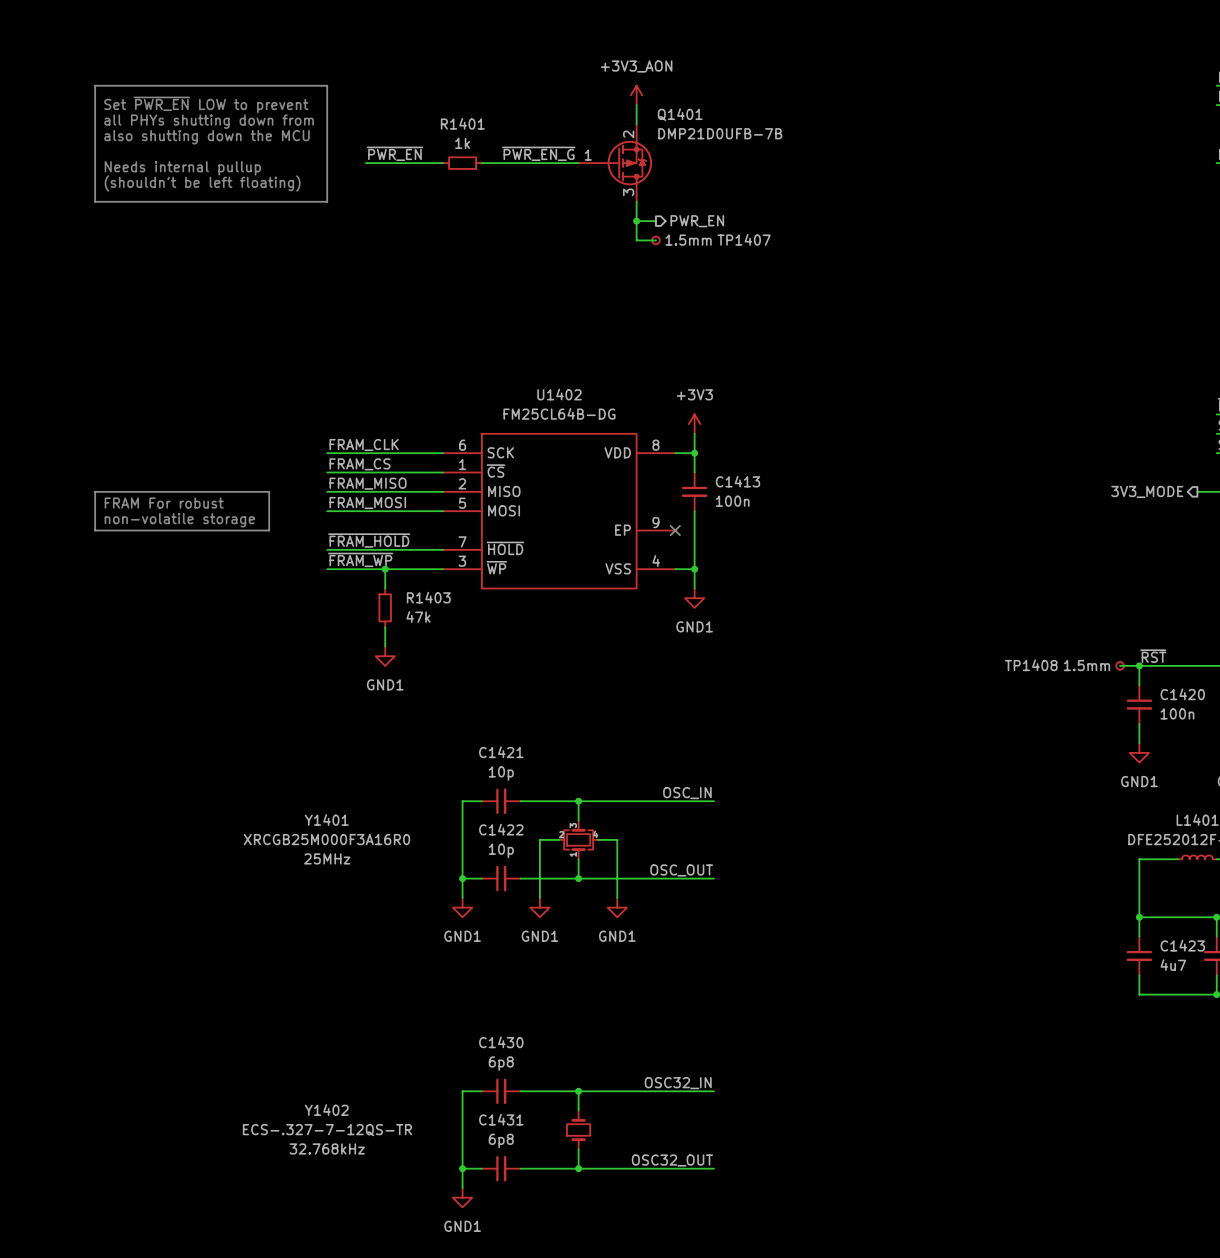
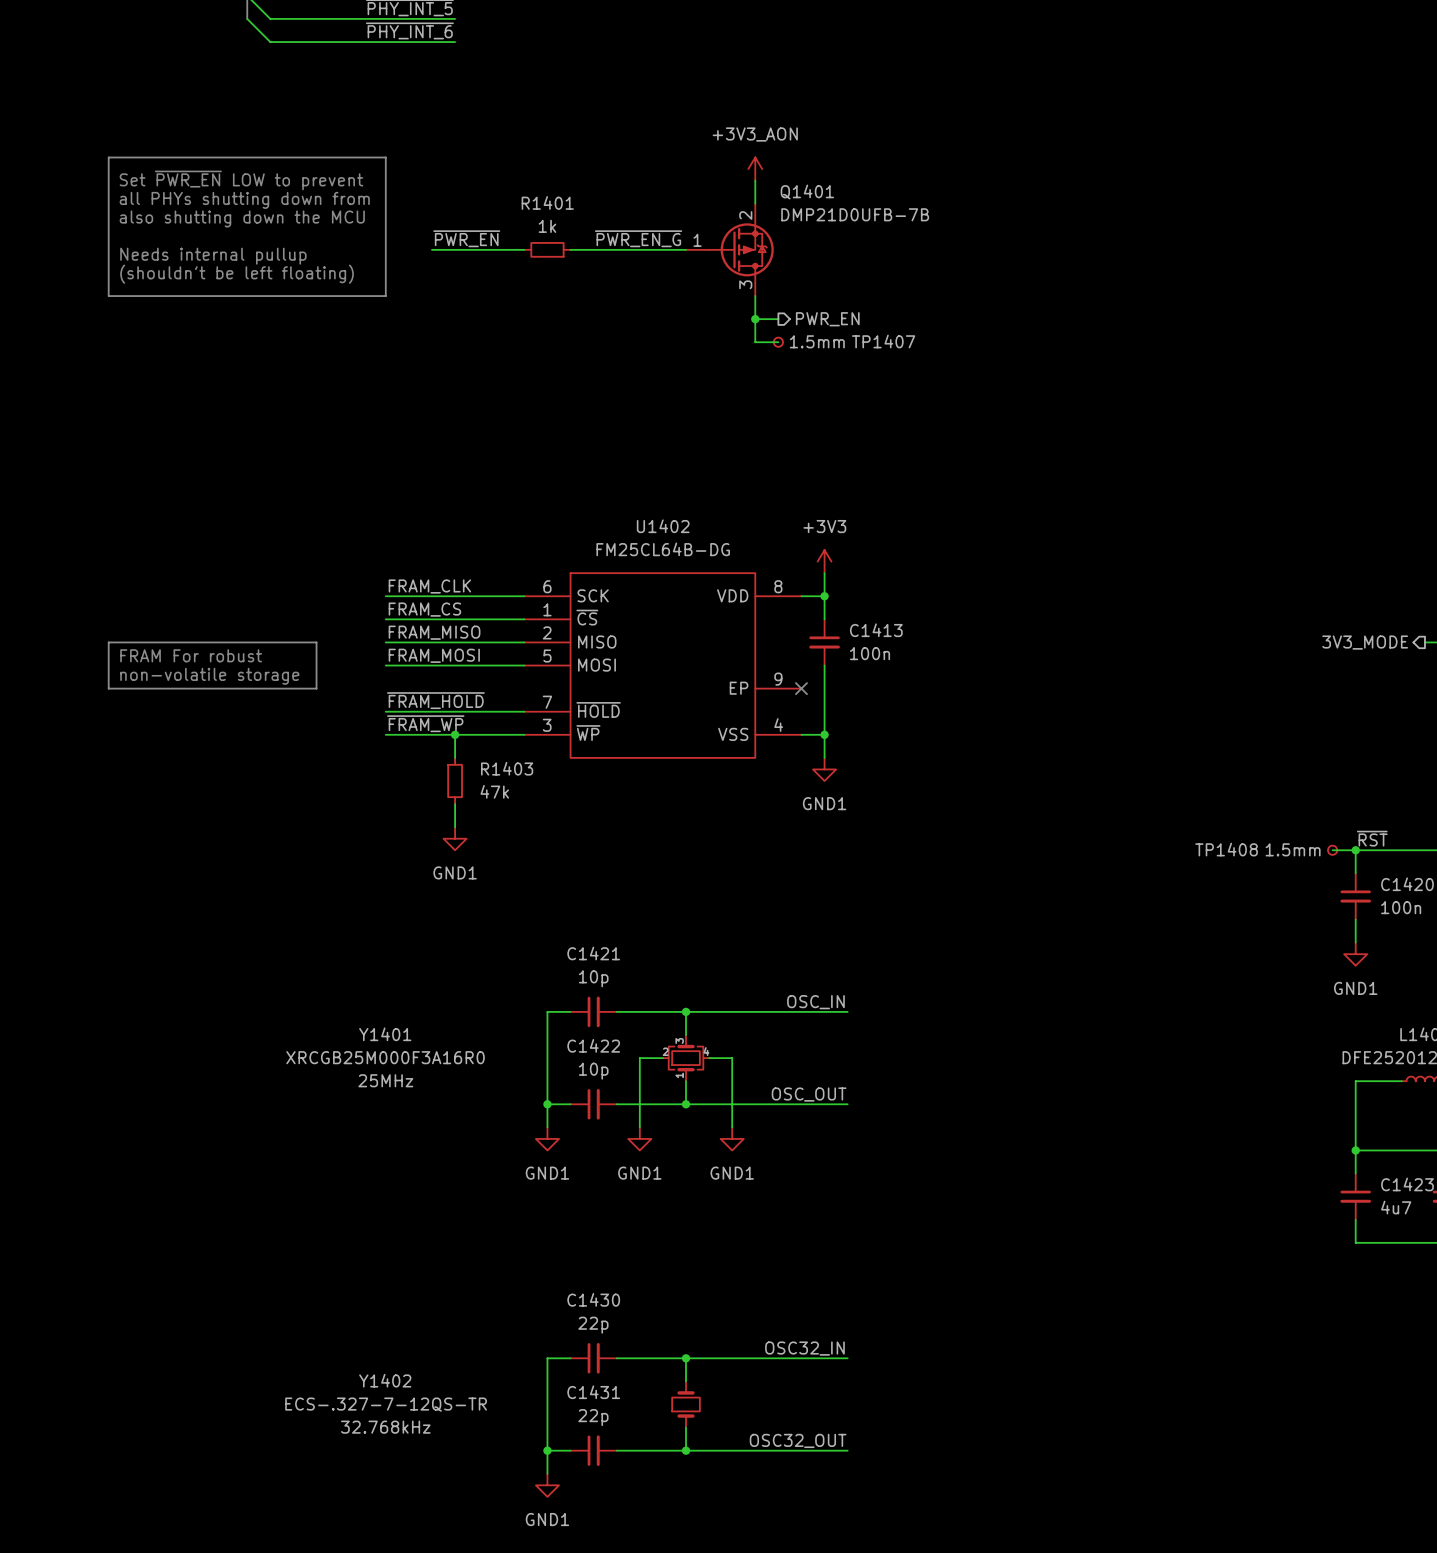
C1430 value: 6p8 (501, 1063) -> 22p (593, 1325)
C1431 value: 6p8 (501, 1140) -> 22p (593, 1417)

